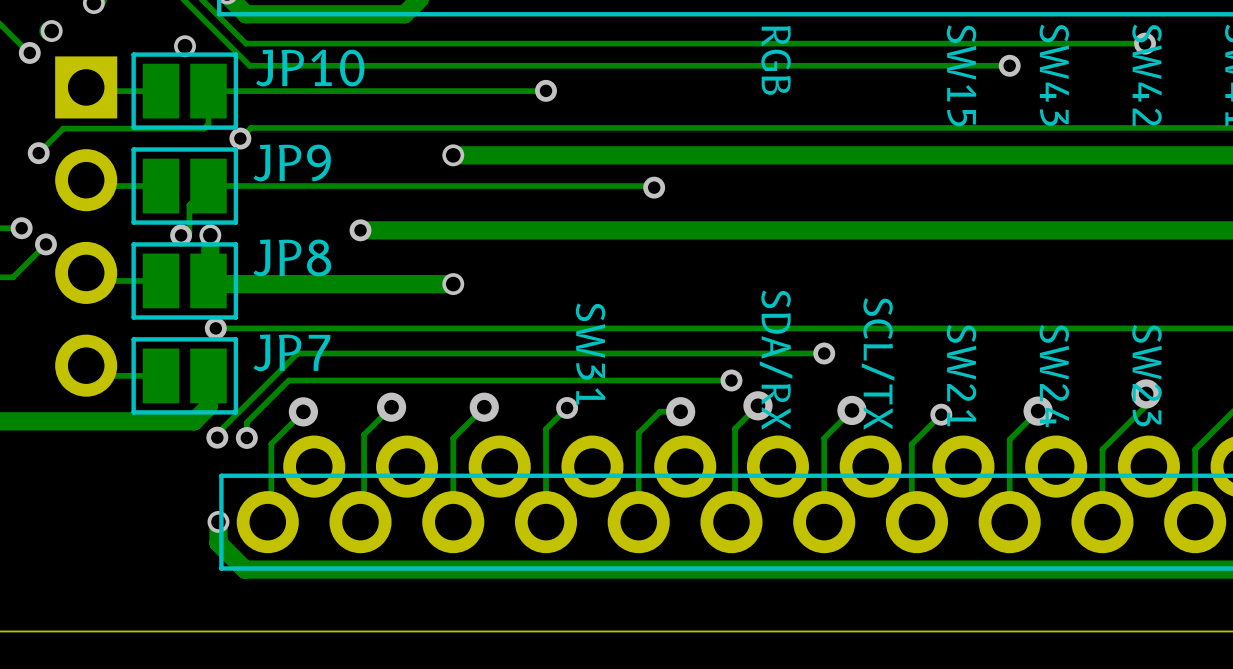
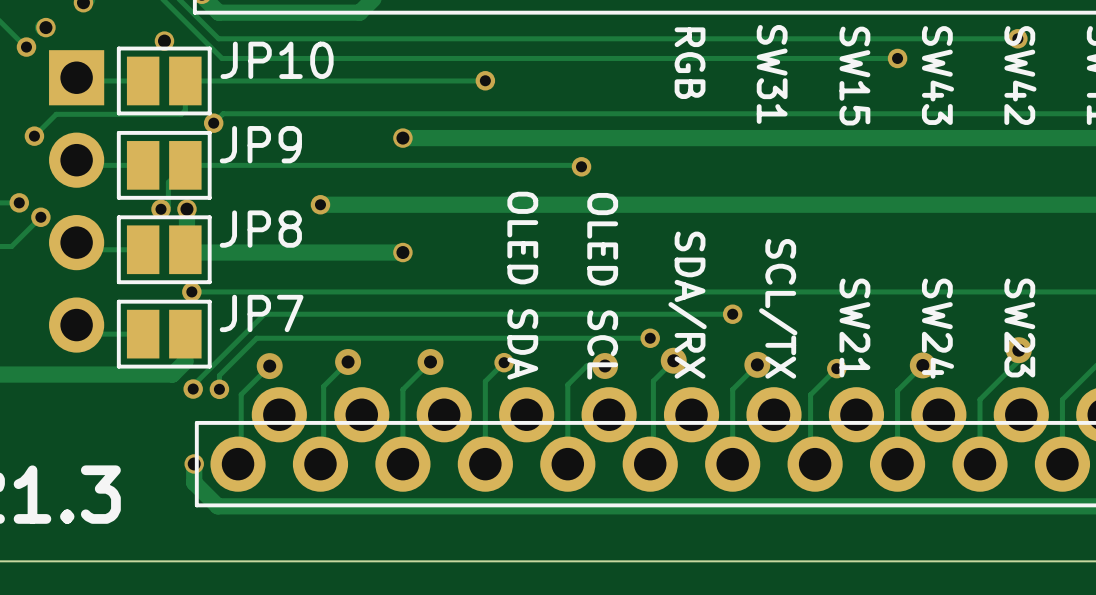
text: none -> OLED SDA (522, 285)
text: none -> OLED SCL (602, 286)
text position: SW31 (590, 353) -> SW31 (772, 74)

